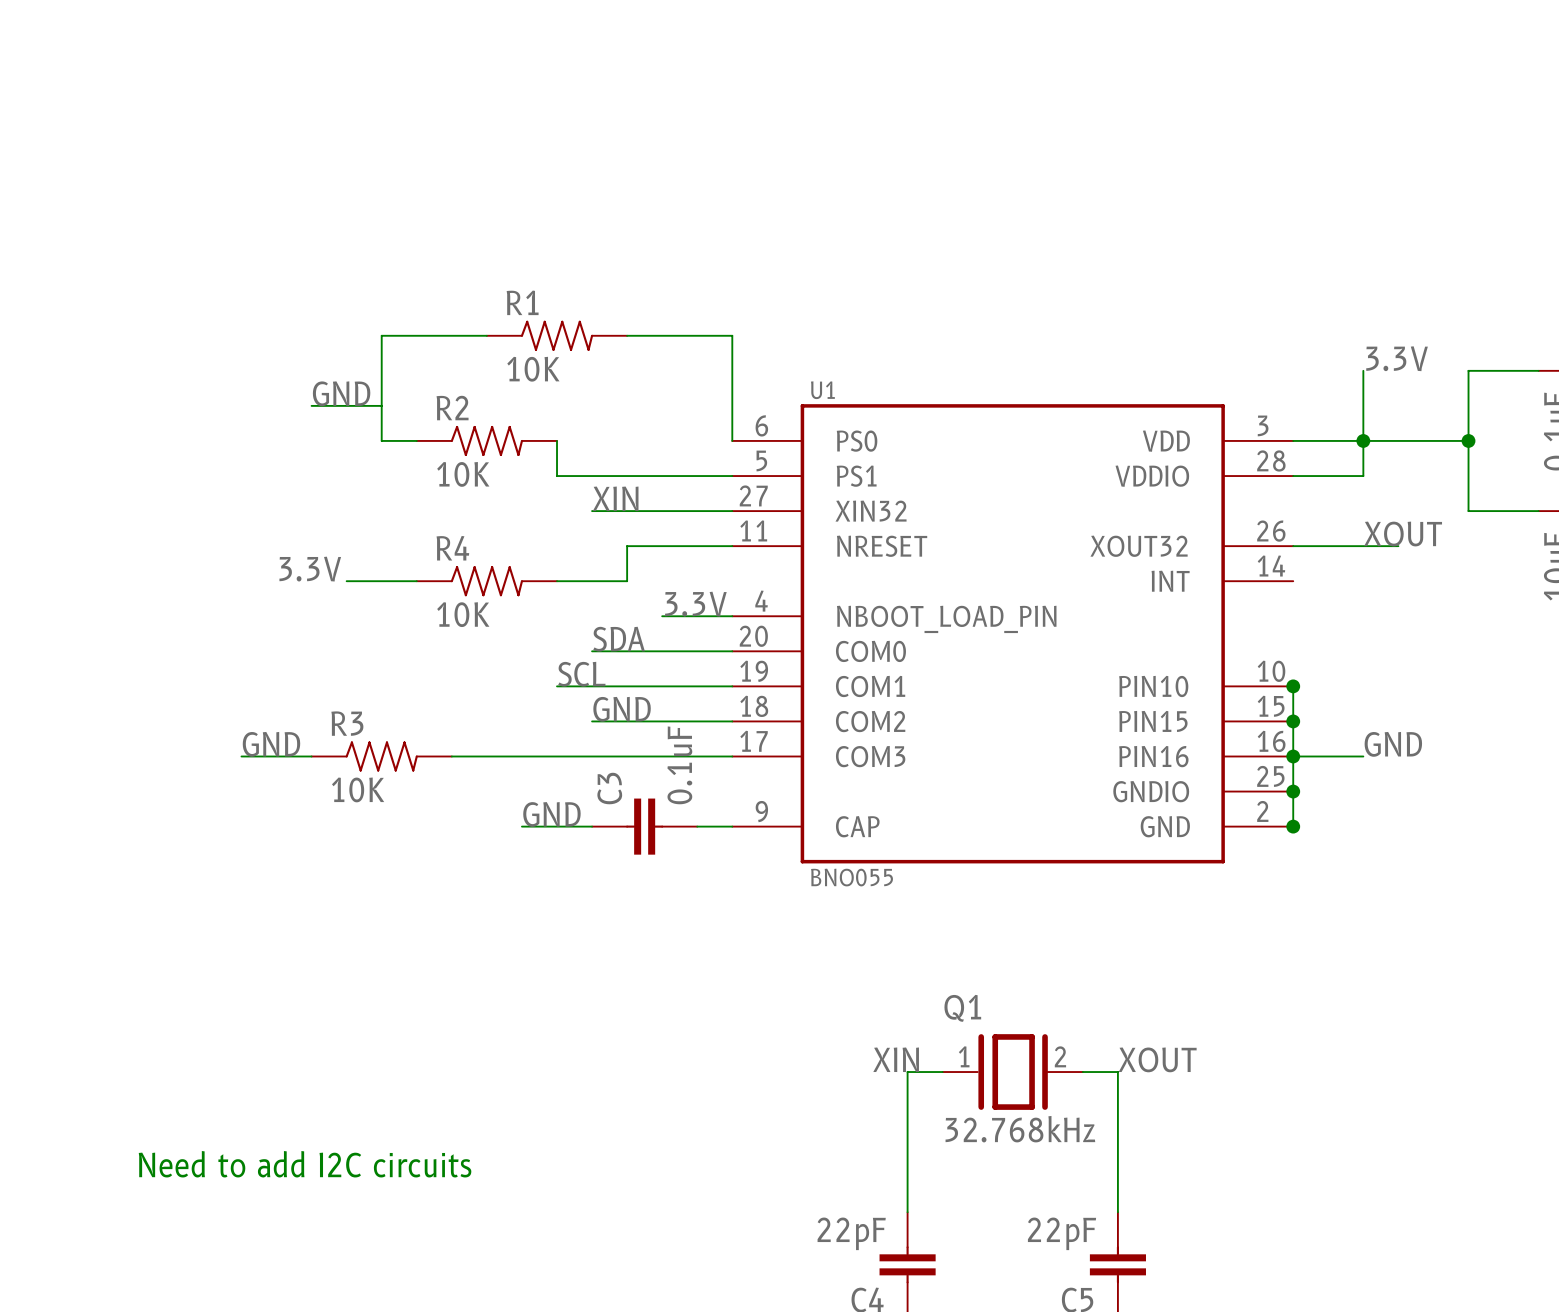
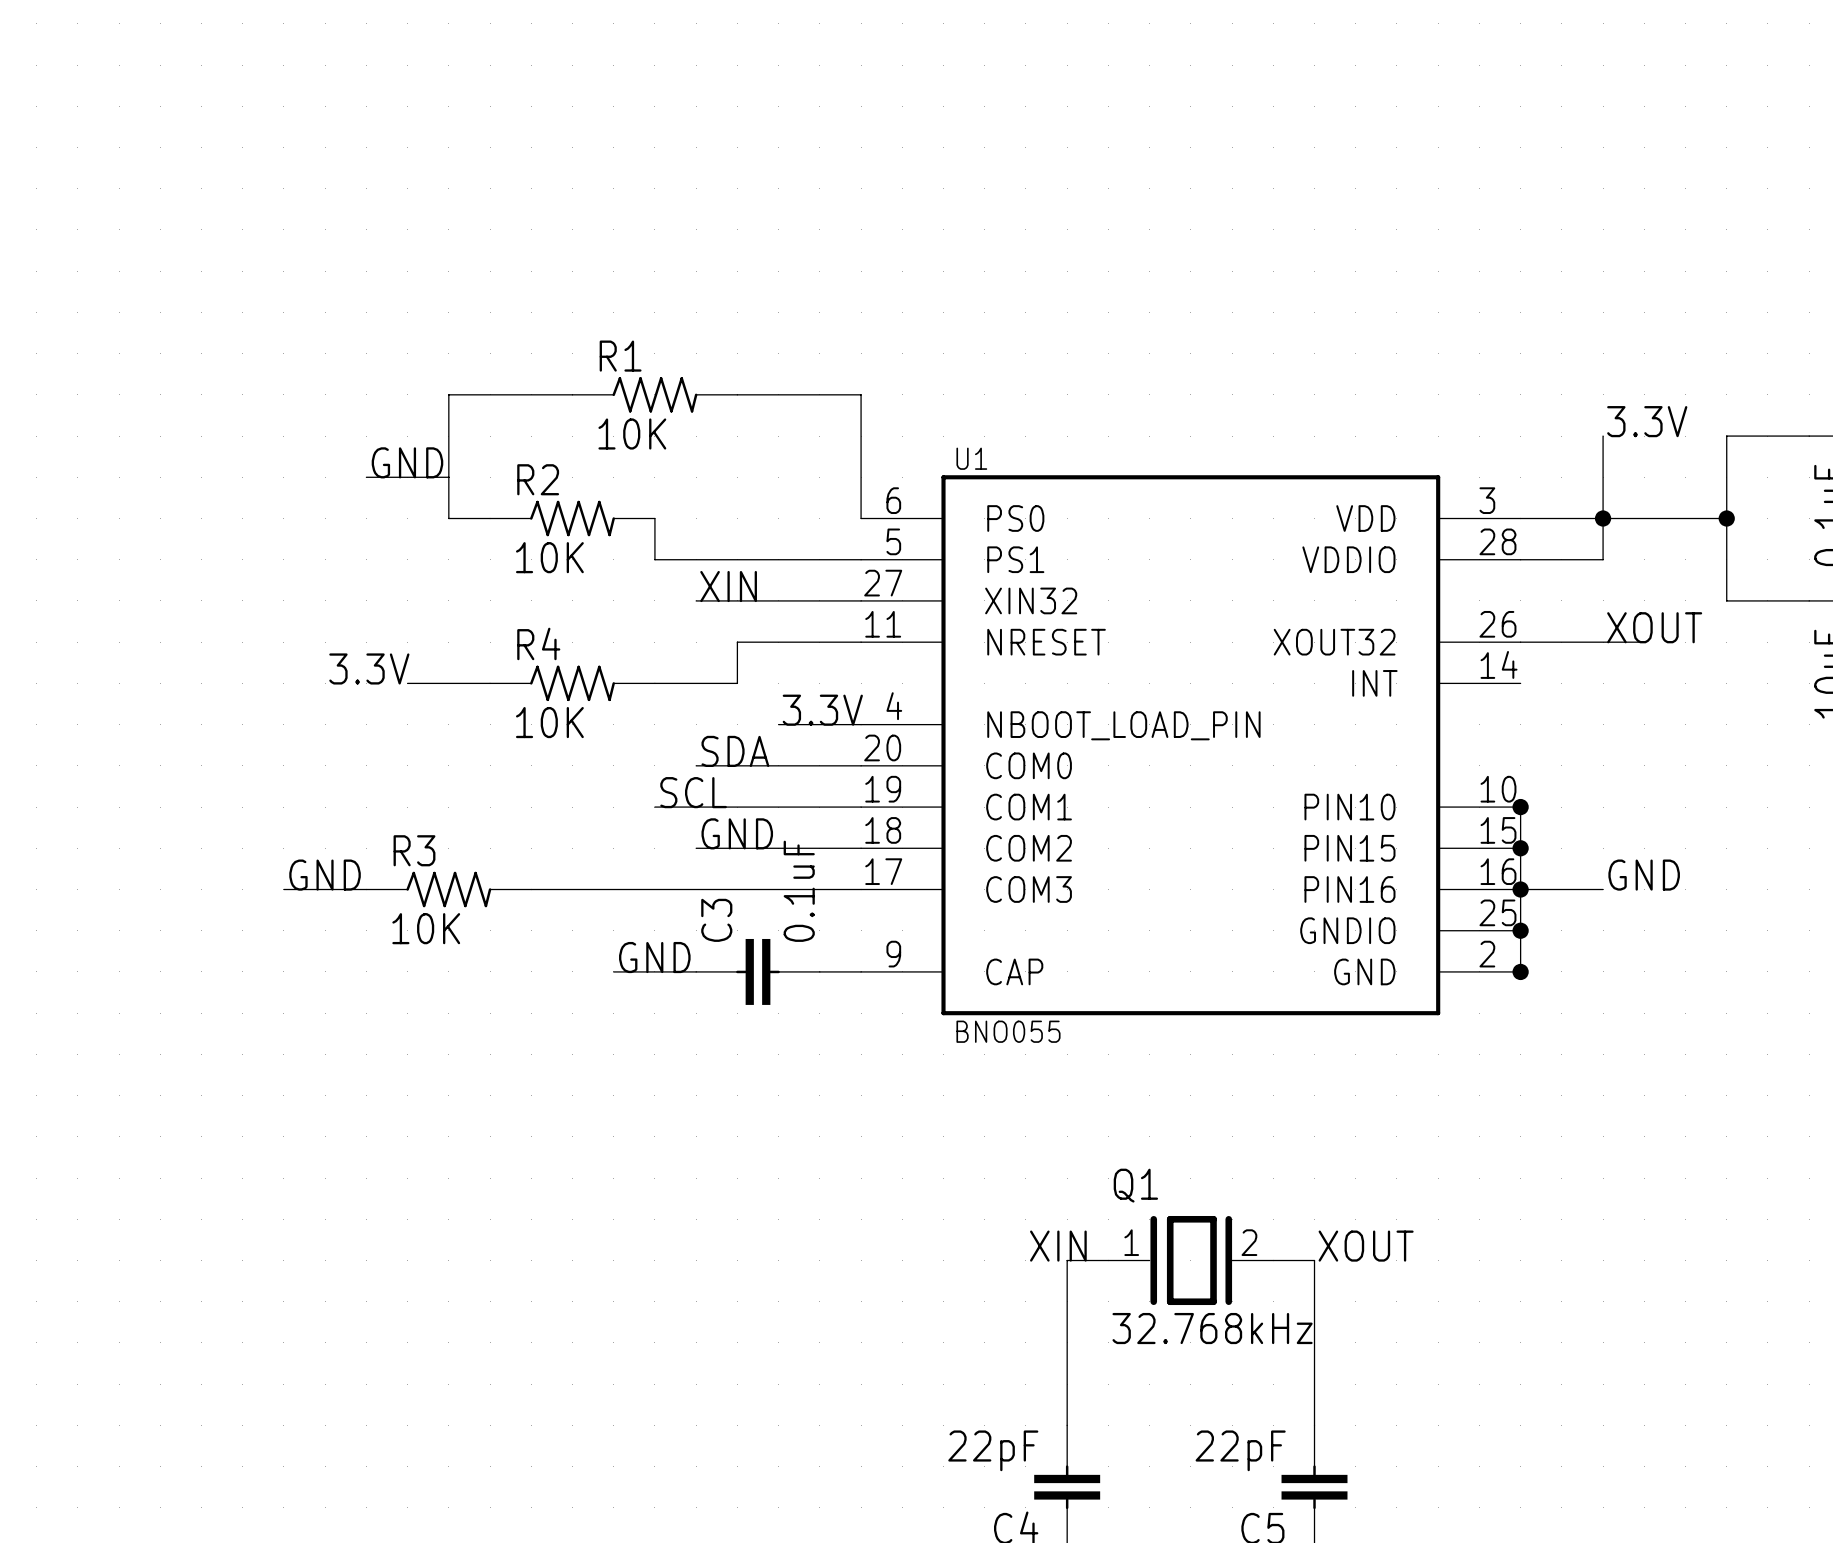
text: Need to add I2C circuits (305, 1164) -> none

